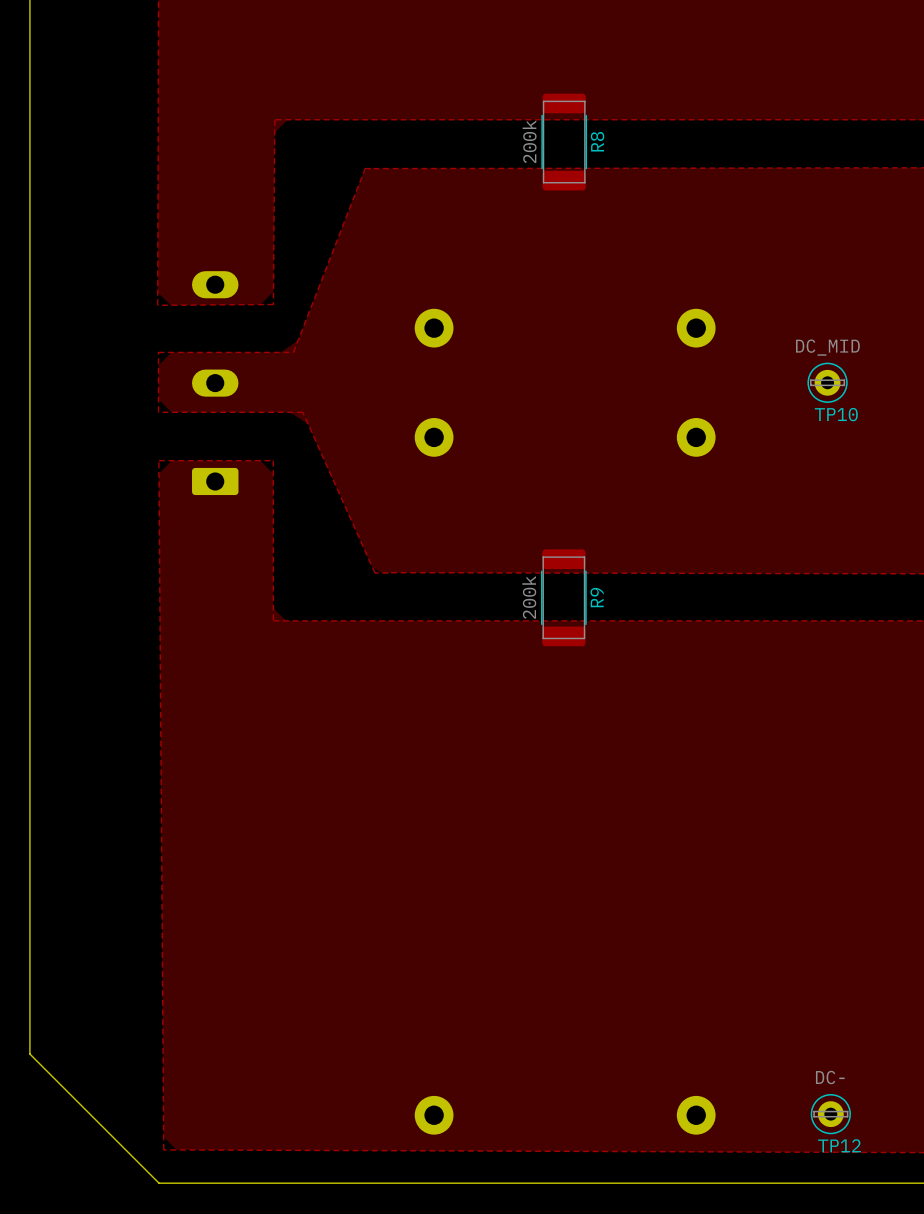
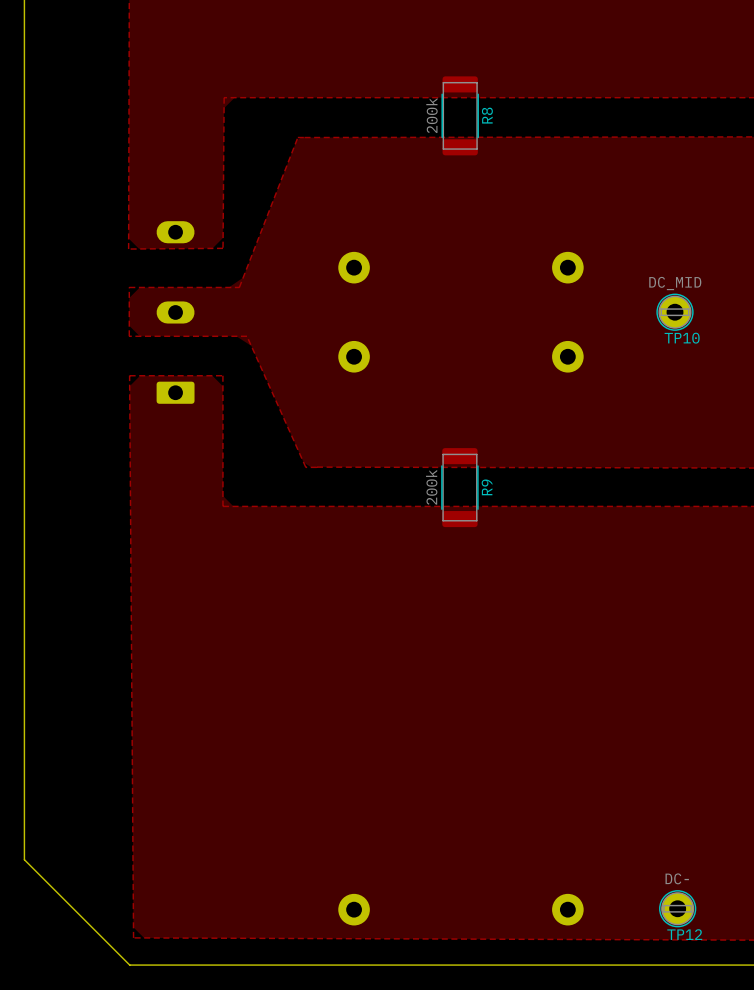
TP10 footprint: [807, 362, 848, 403] -> [656, 293, 694, 331]
TP12 footprint: [810, 1093, 851, 1135] -> [659, 890, 697, 928]

